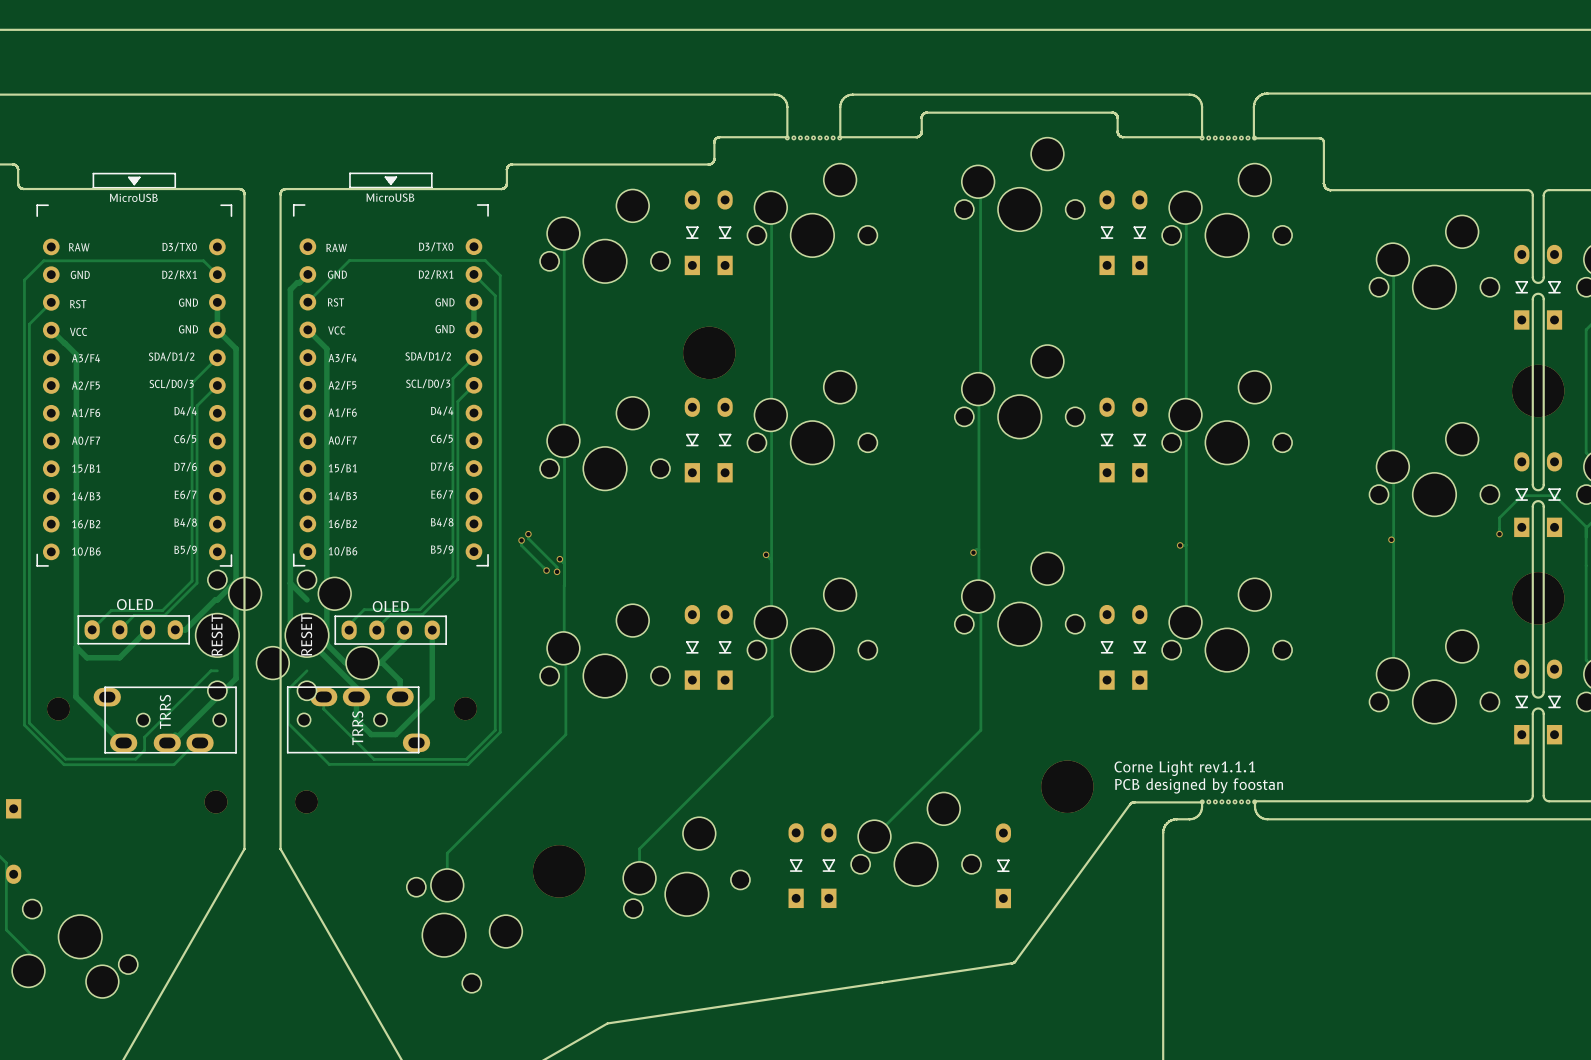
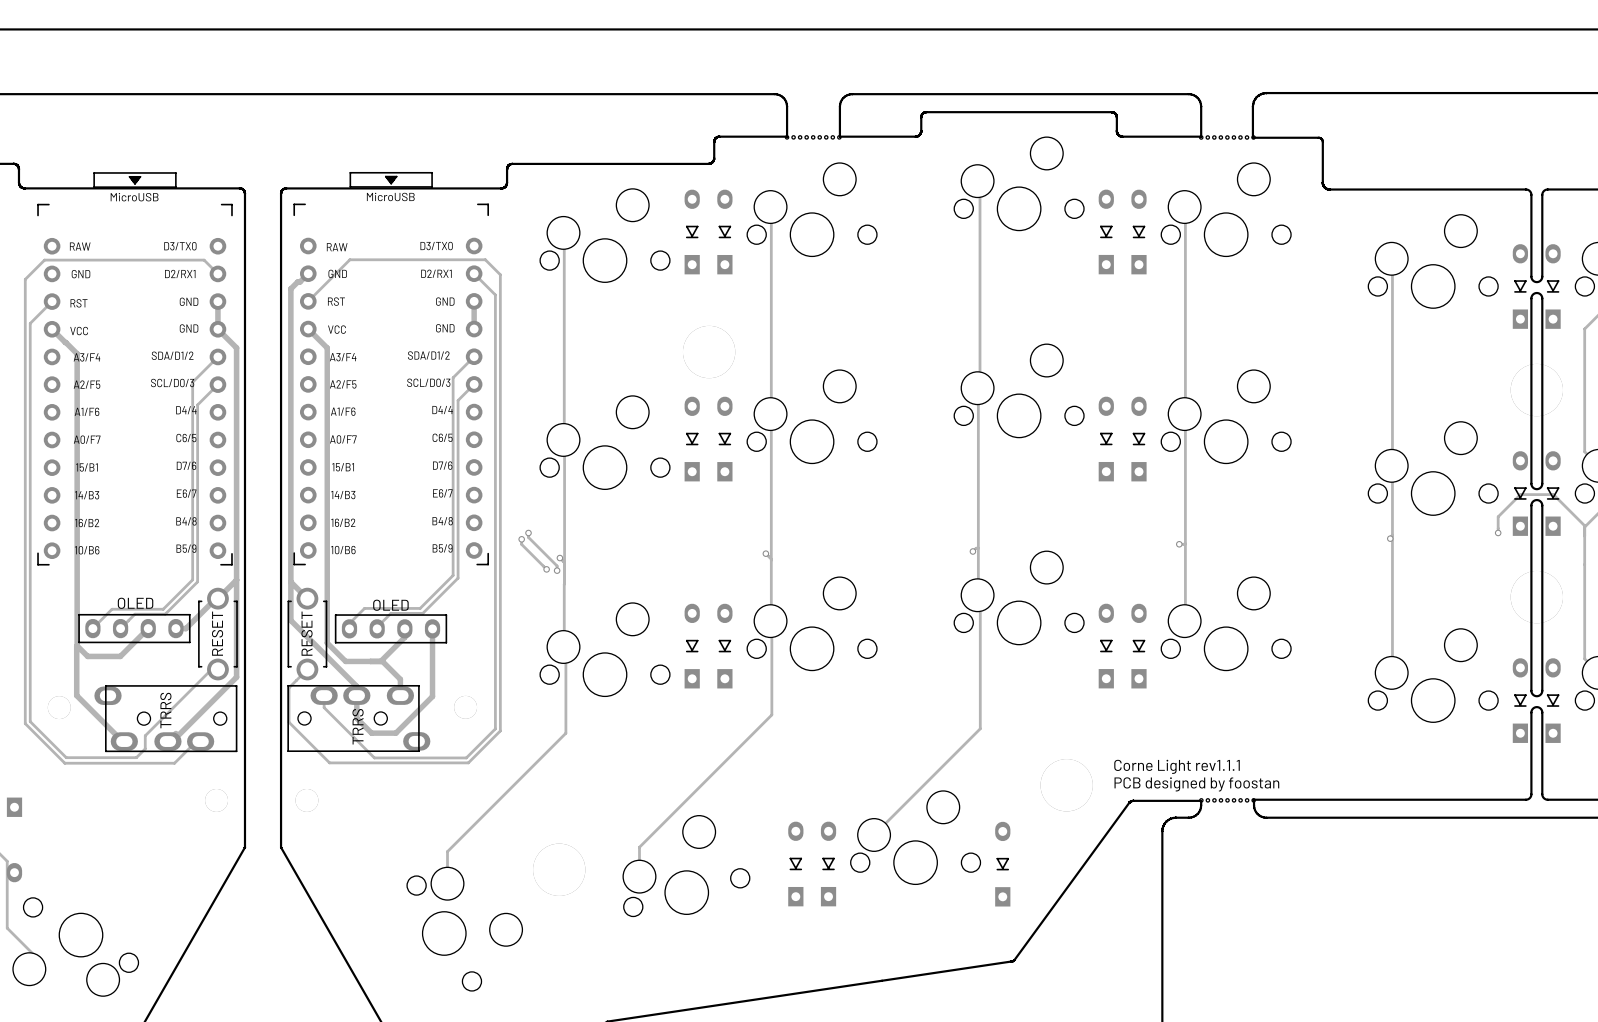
part: none -> (217, 634)
part: (242, 635) -> none
part: none -> (307, 634)
part: (332, 635) -> none

